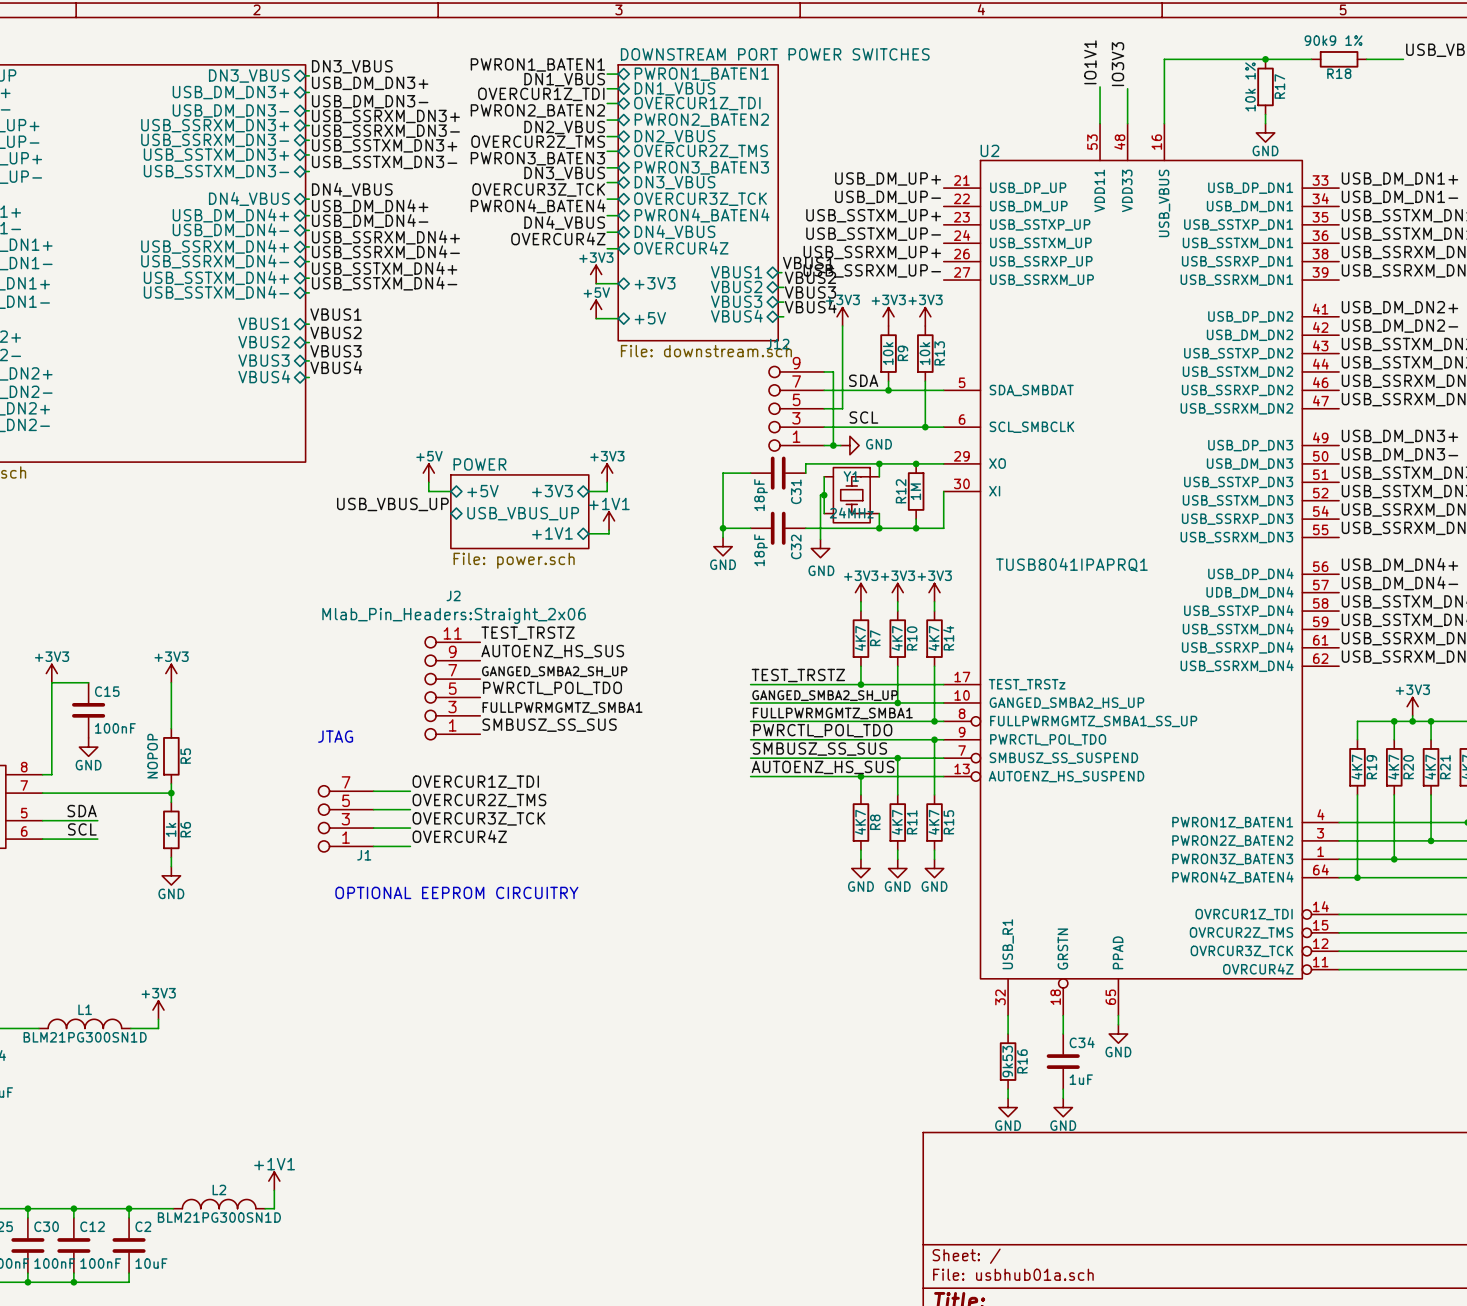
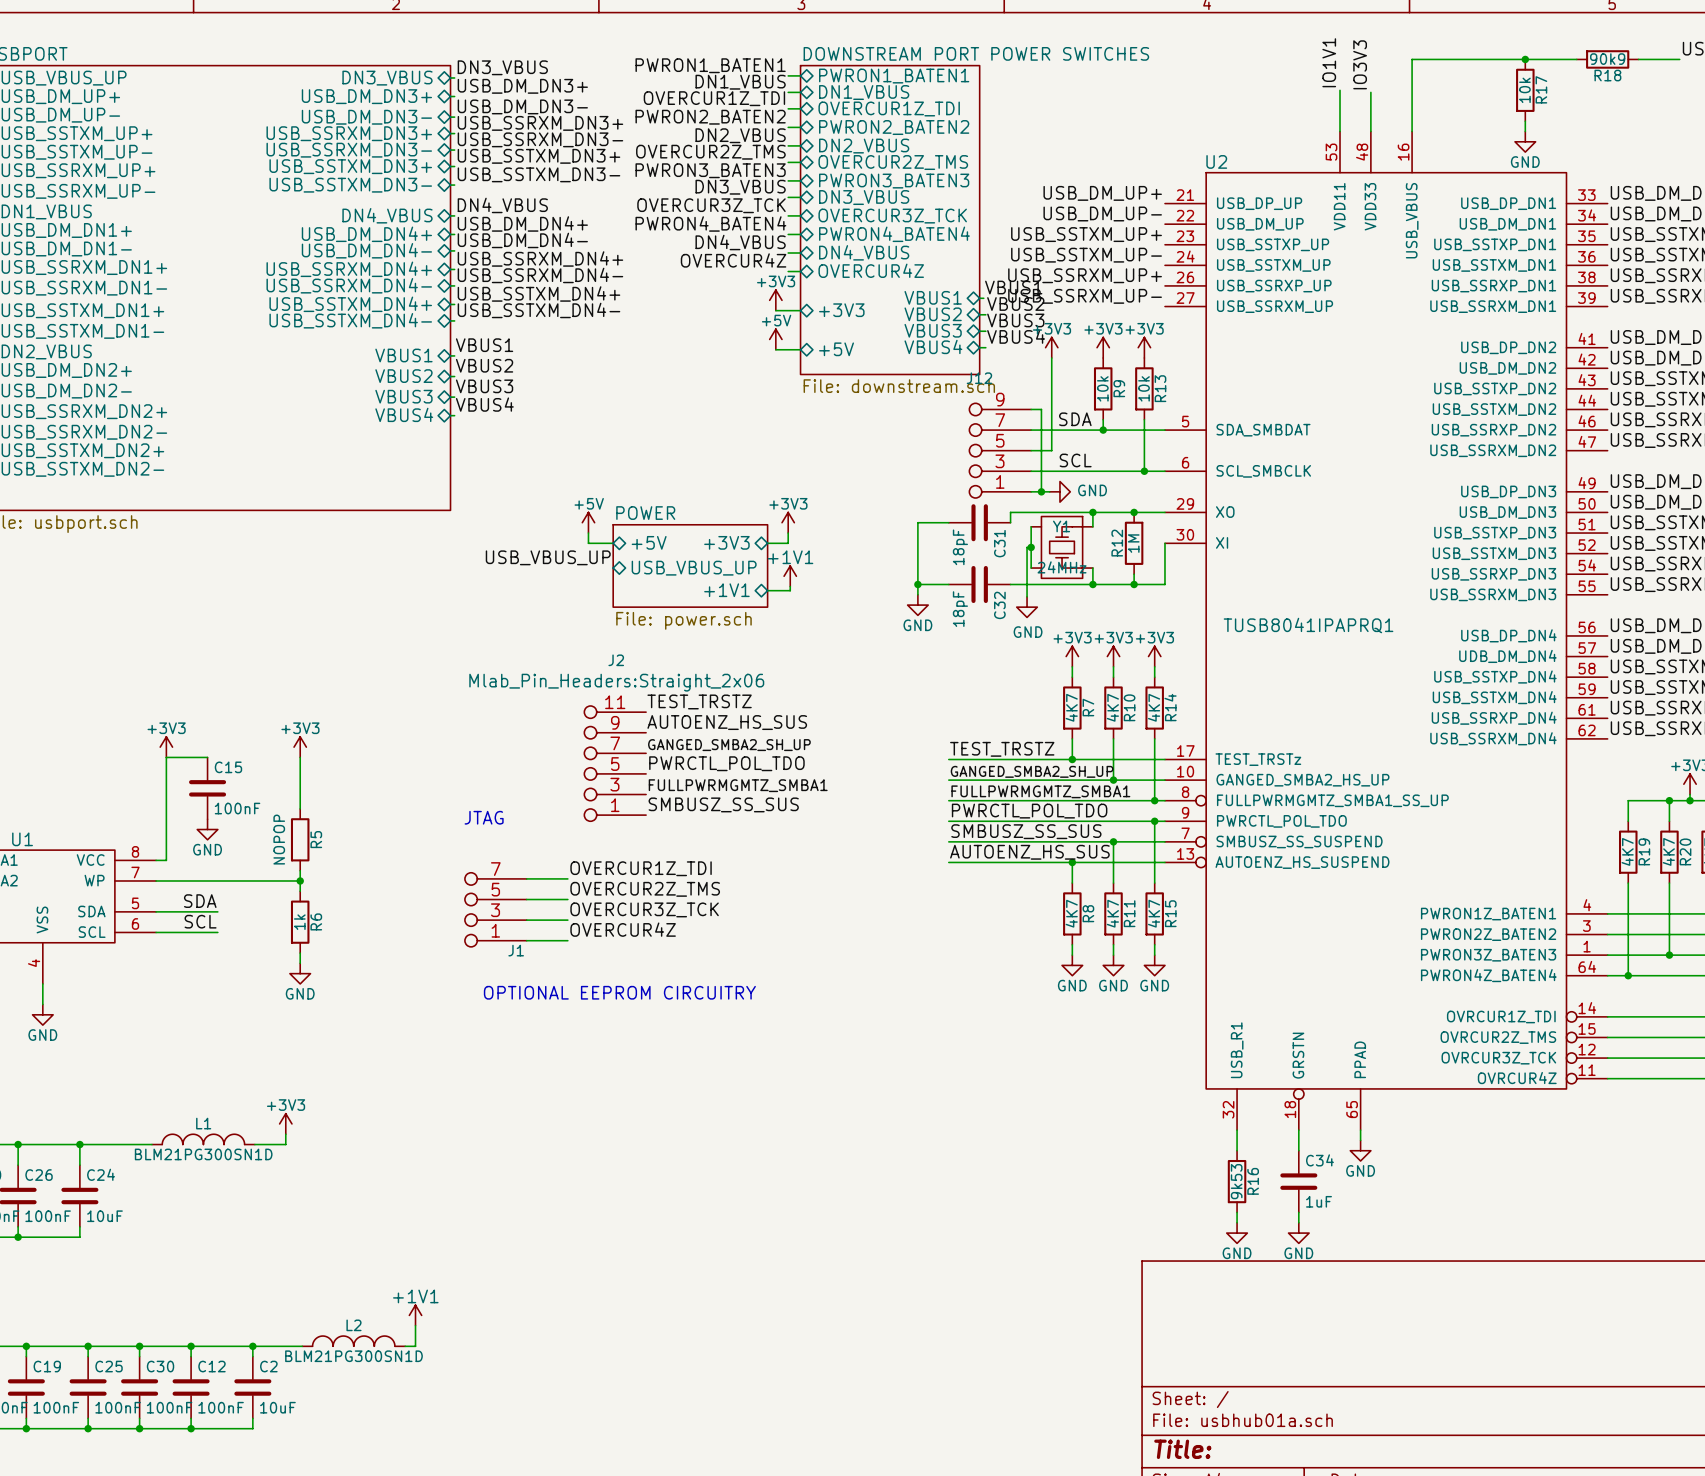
R18 value: 90k9 1% (1333, 40) -> 90k9 (1607, 59)
R17 value: 10k 1% (1250, 86) -> 10k (1524, 90)

